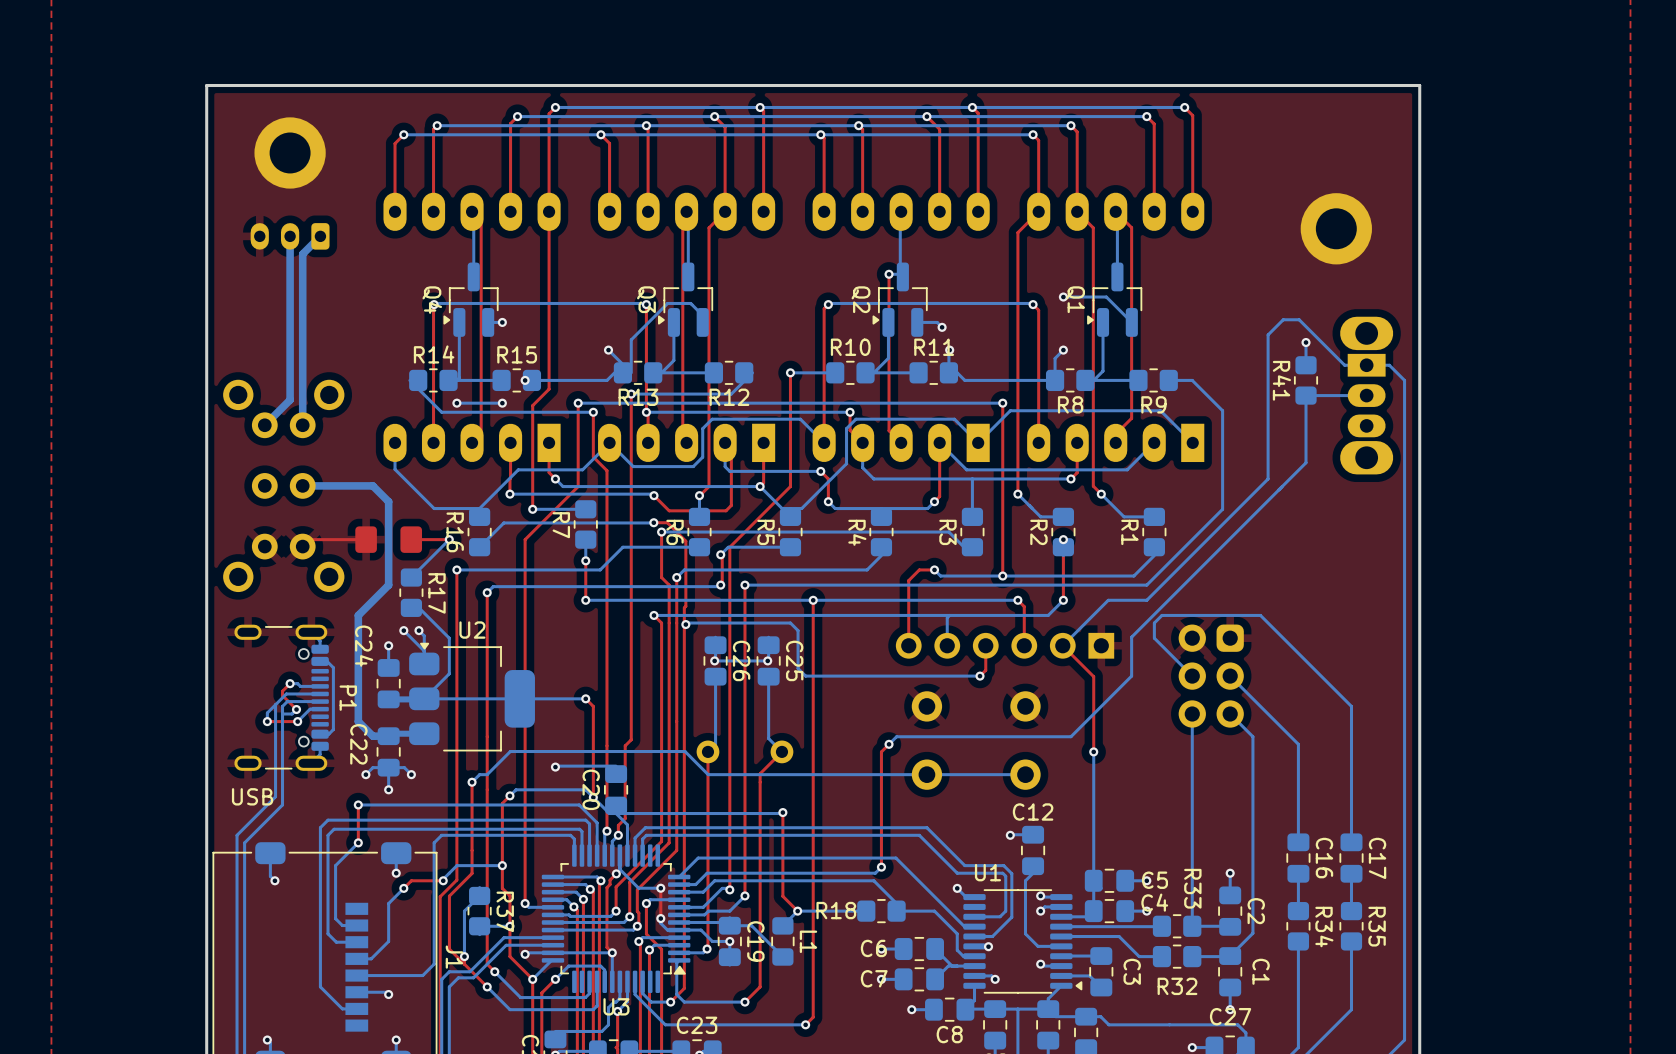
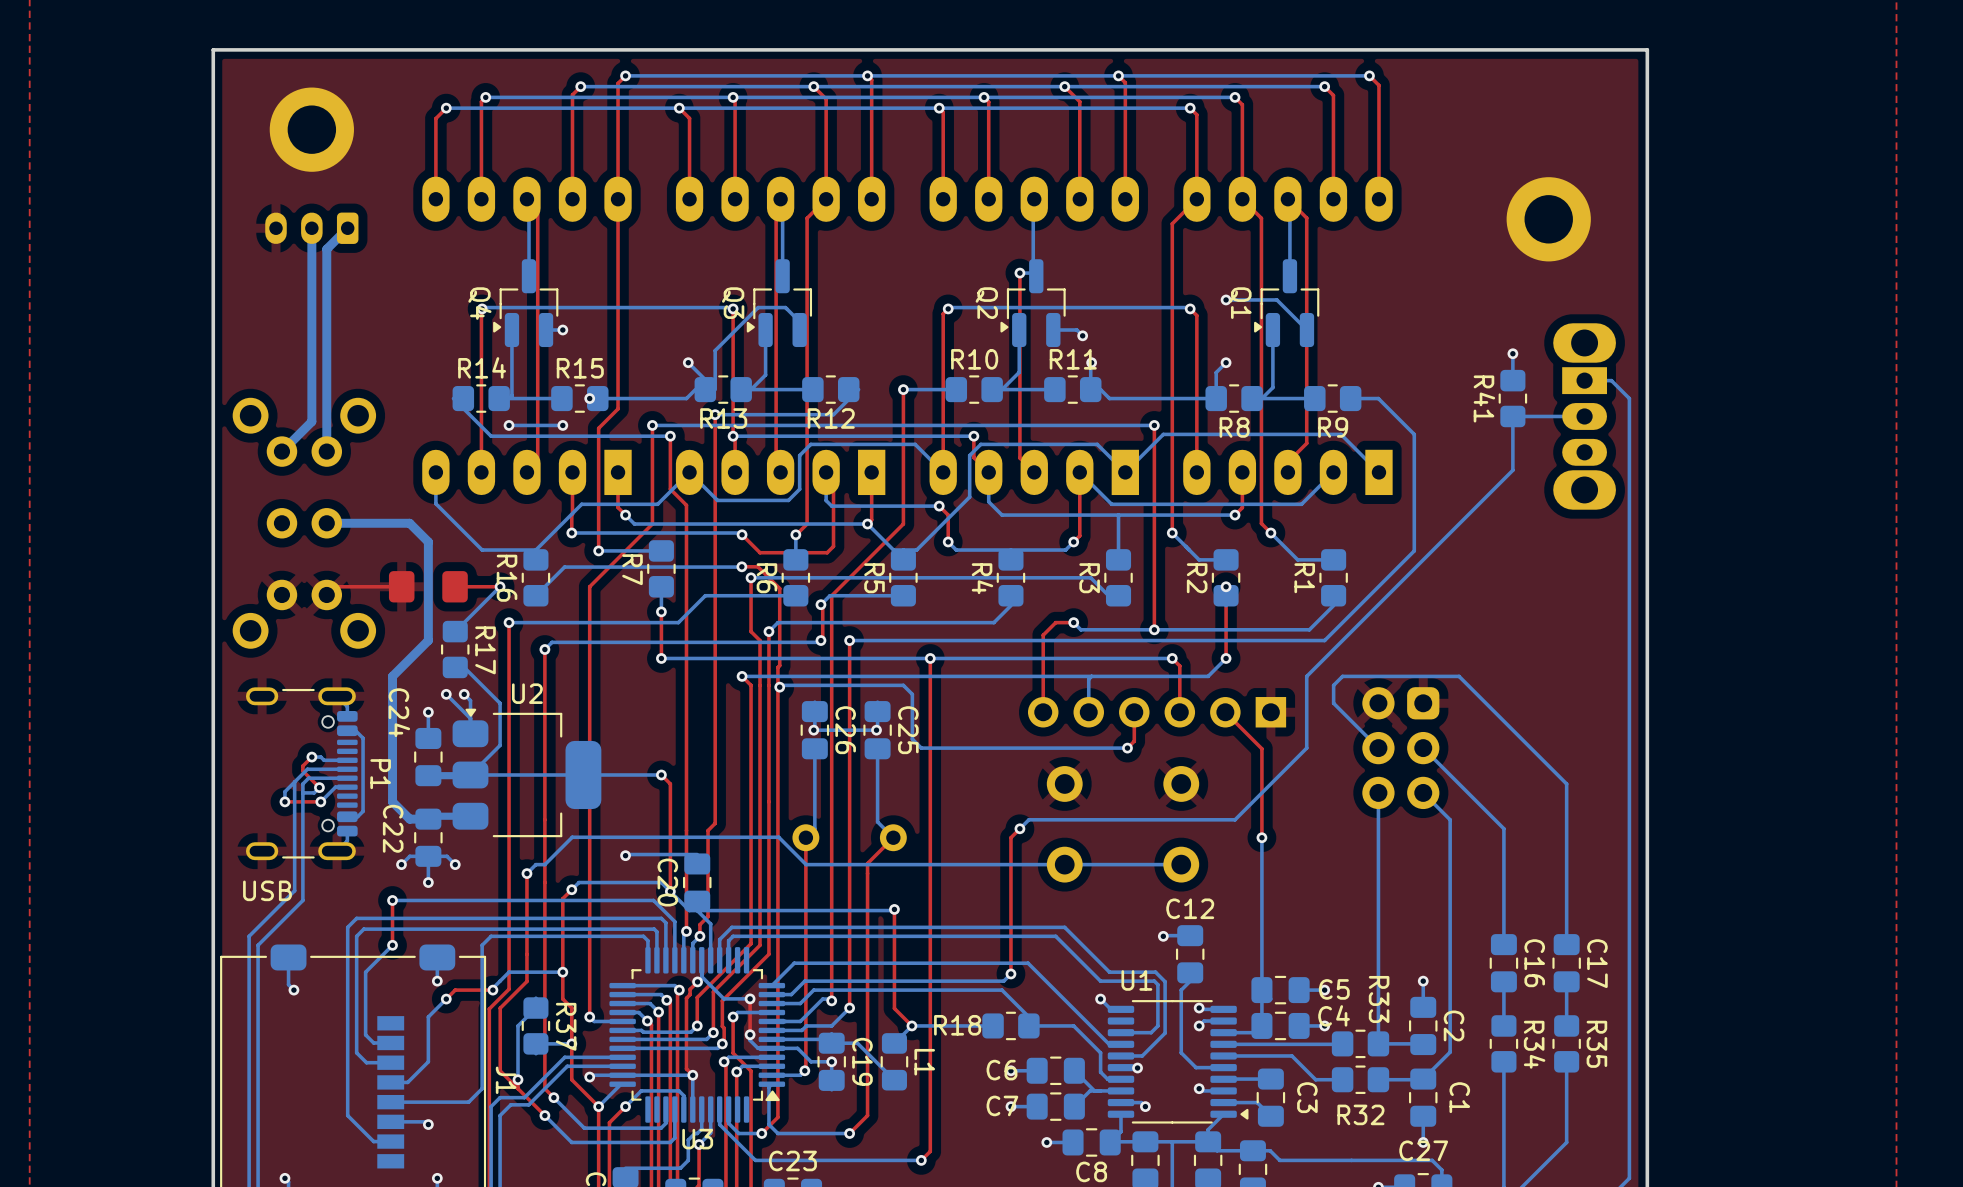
bottom track: (1366, 365) (1344, 365) (1299, 319) (1283, 319) (1268, 334) (1268, 478) -> (1512, 470) (1468, 515)
bottom track: (1306, 441) (1306, 462) (1131, 637) -> none
bottom track: (1146, 600) (1108, 600) (1062, 645) -> (1324, 658) (1306, 676) (1306, 702)

